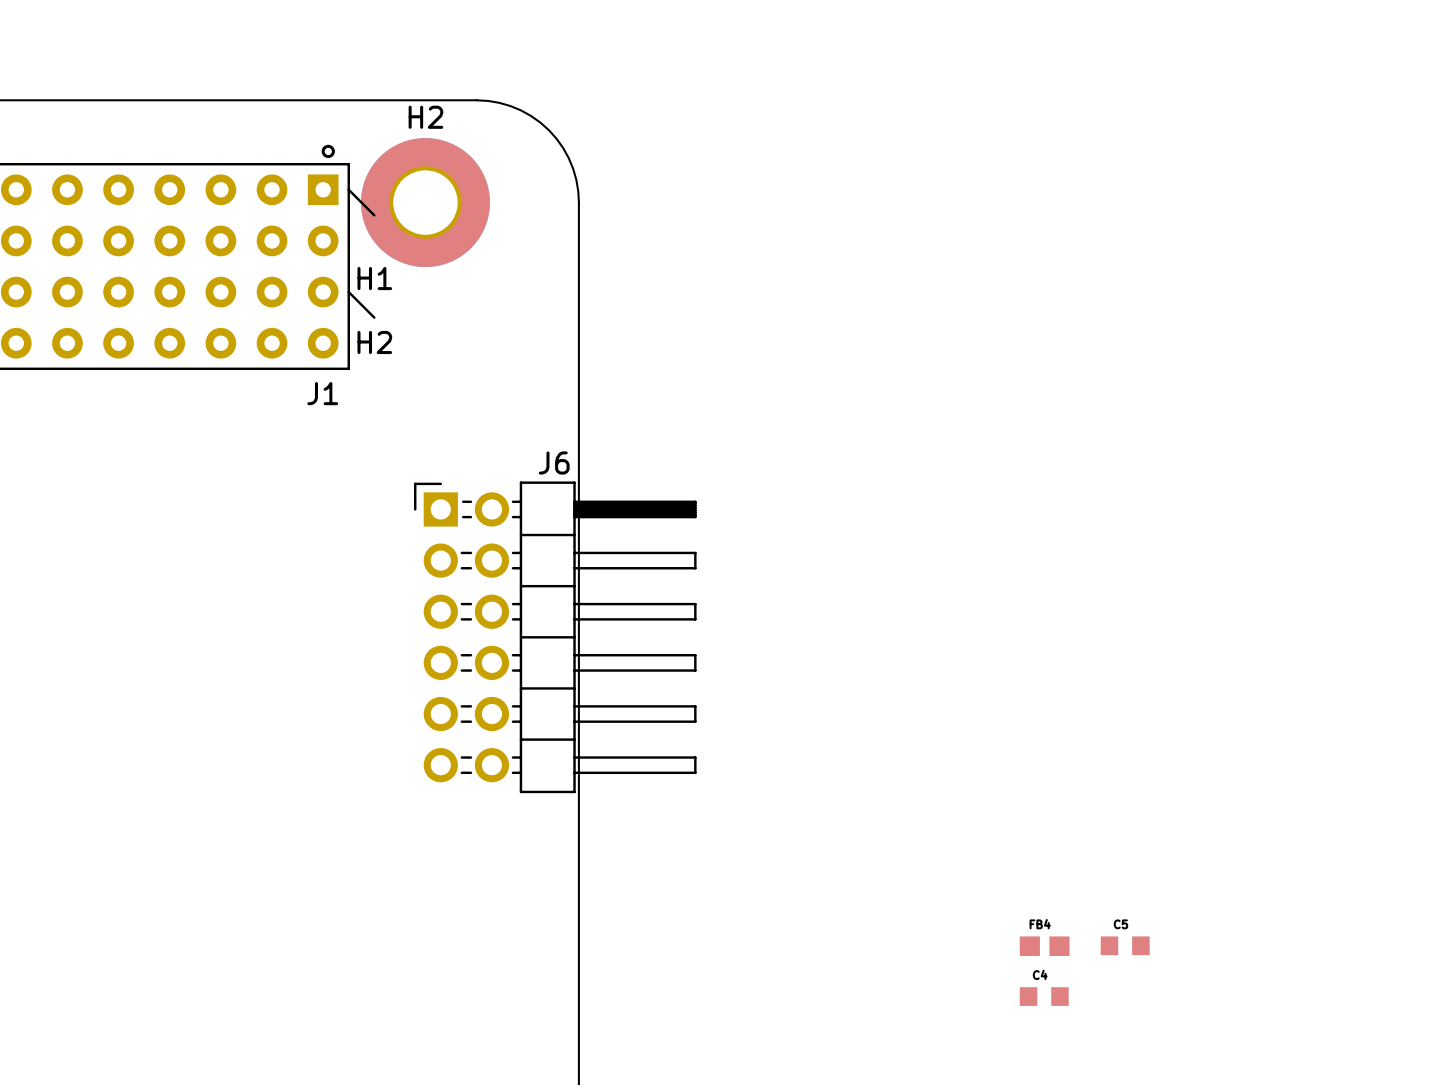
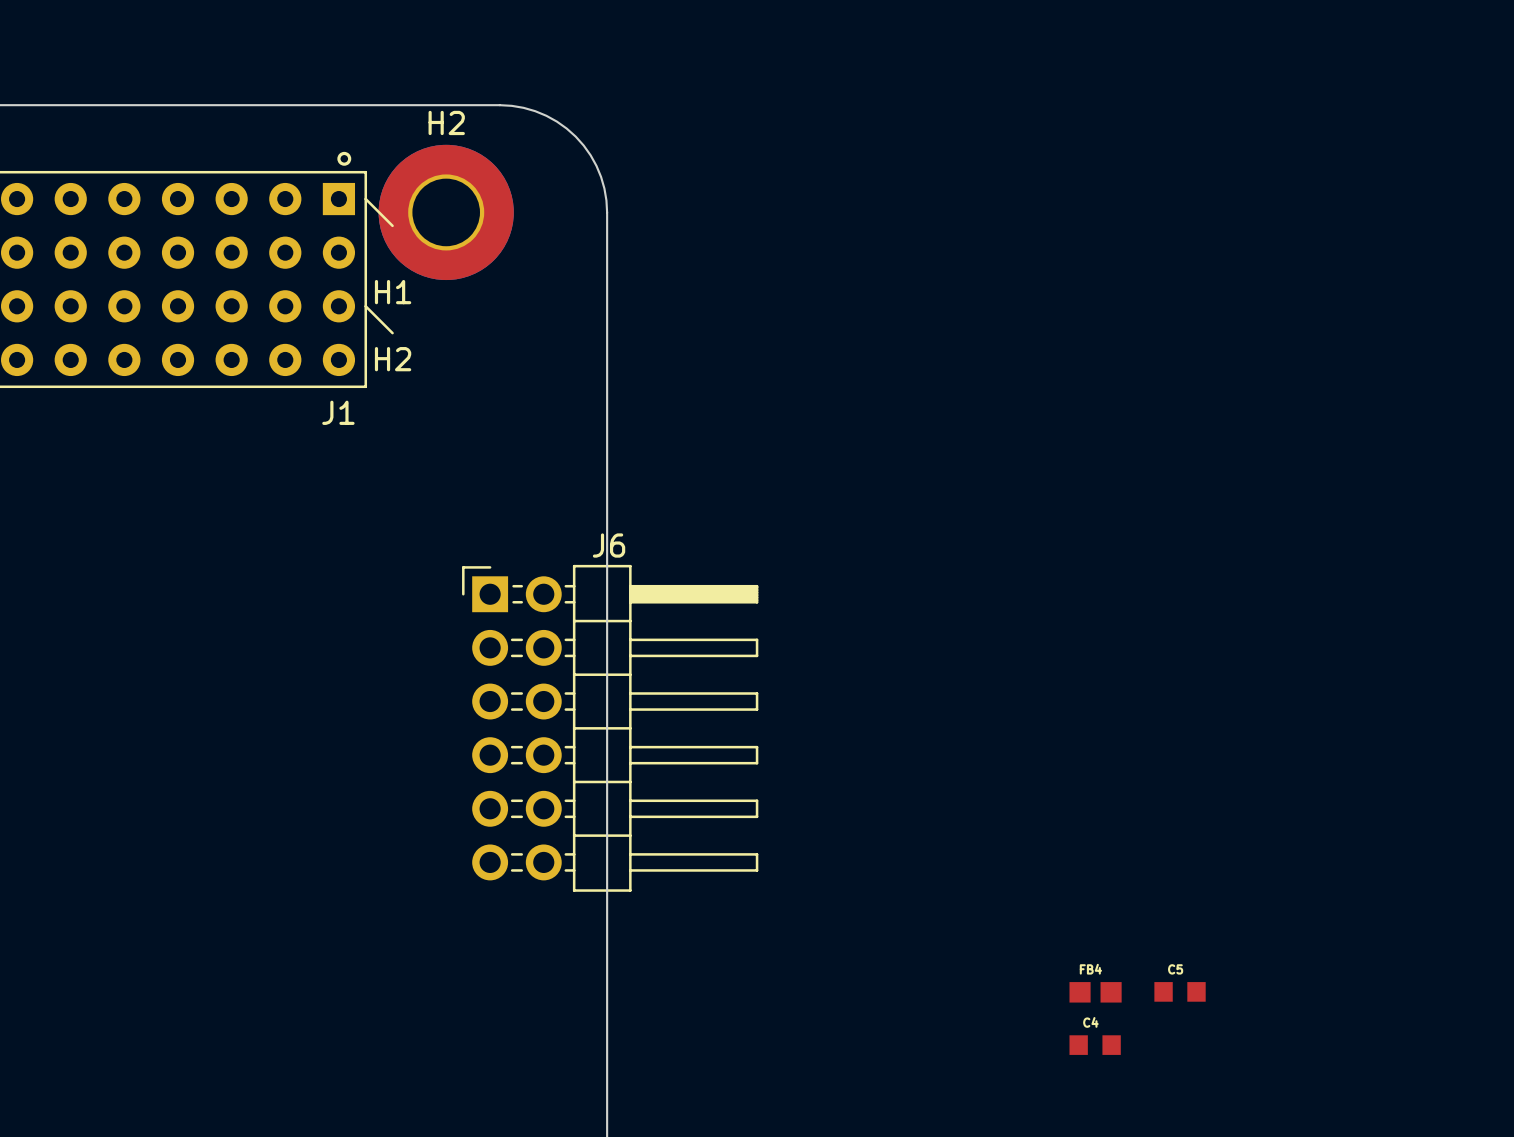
J6 position: (555, 637) -> (610, 728)

